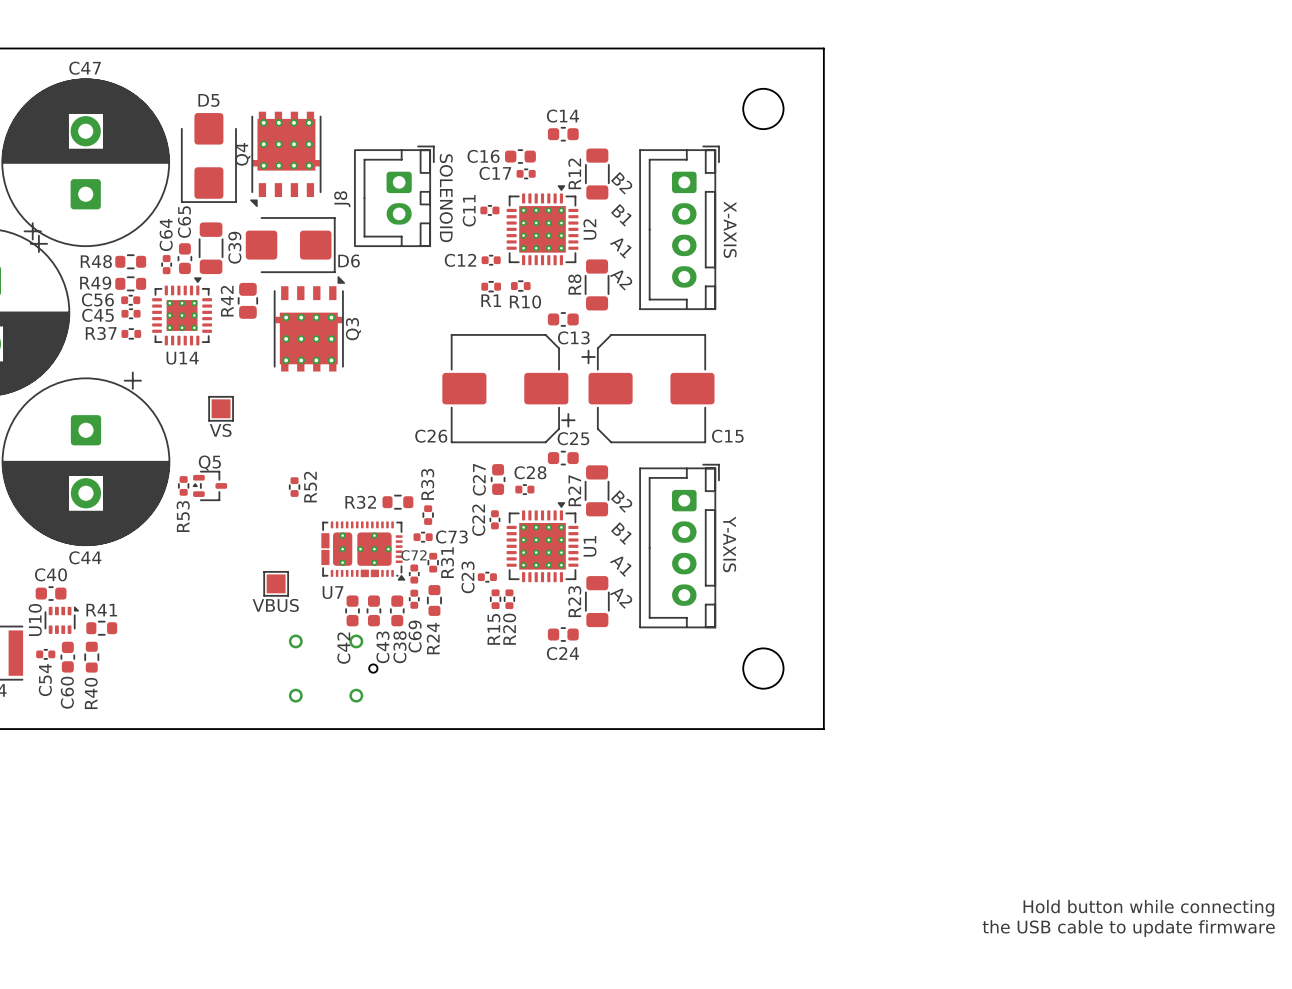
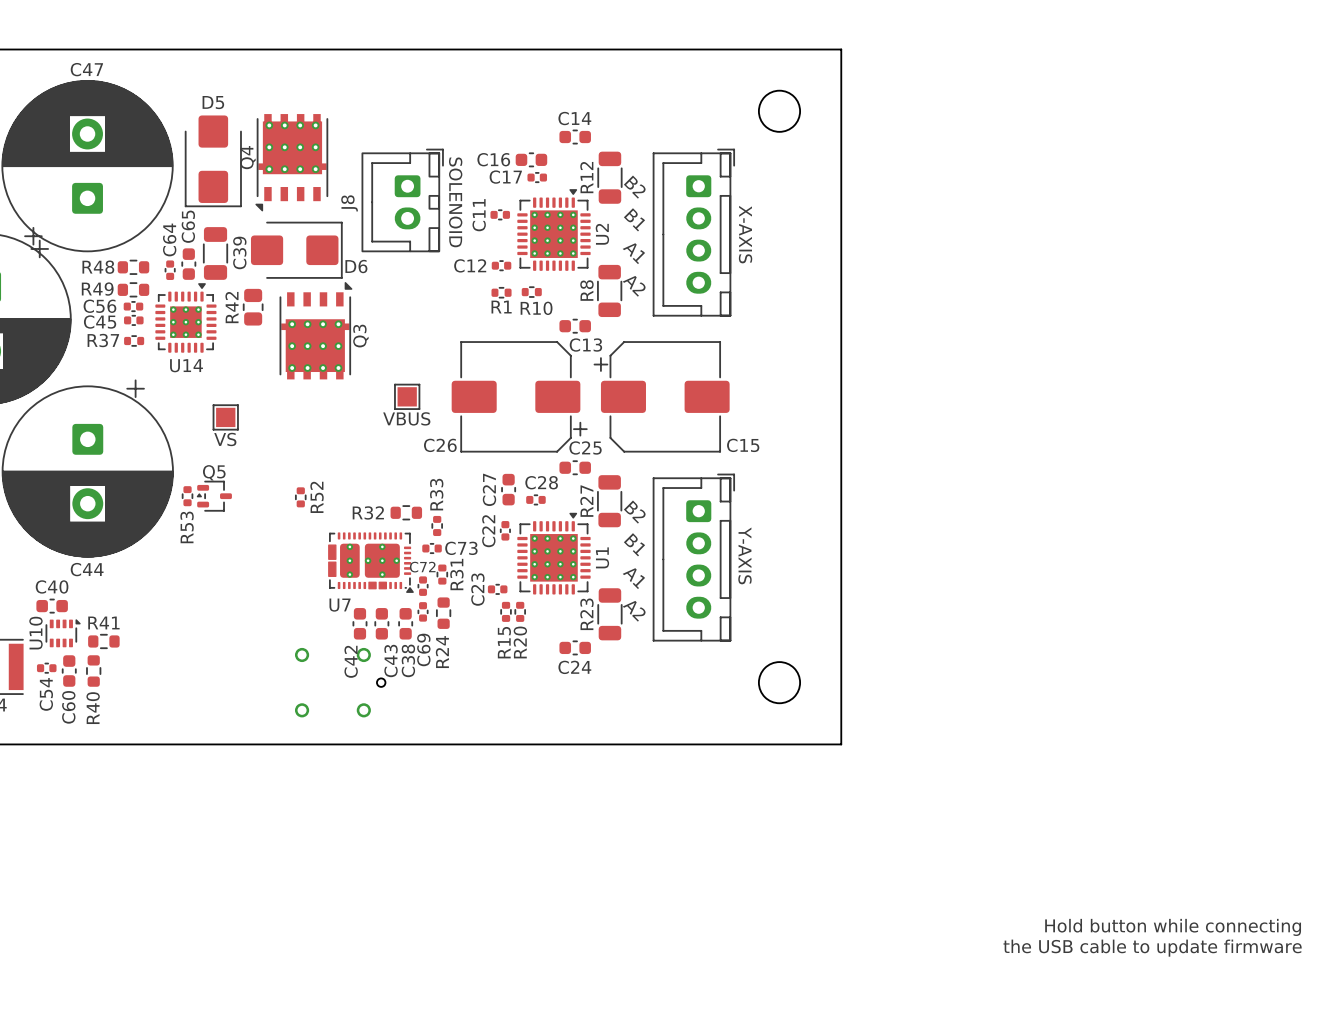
part position: (276, 583) -> (407, 396)

